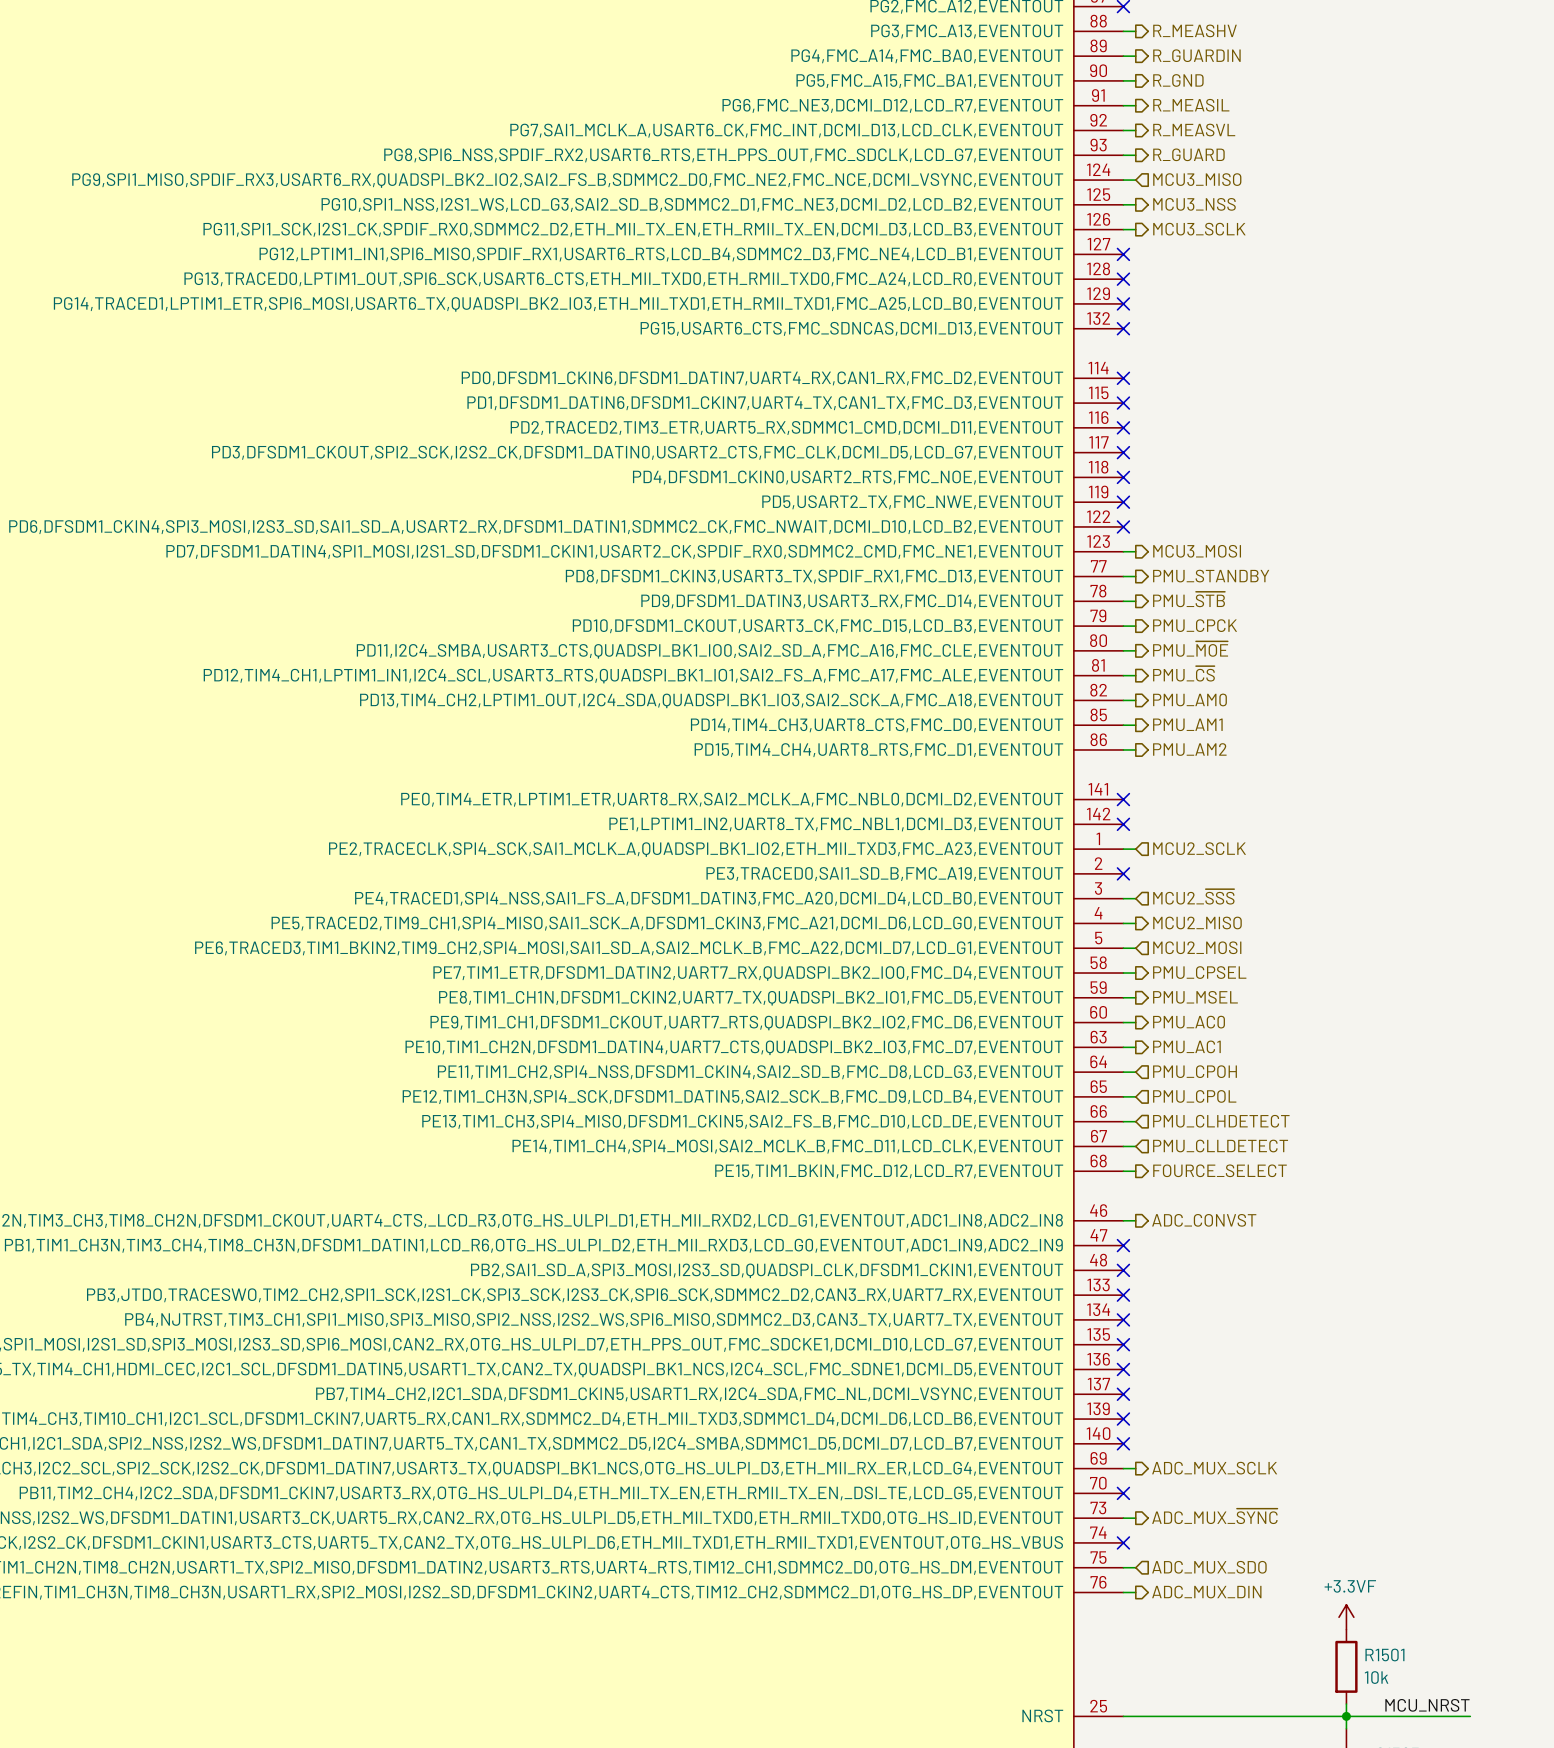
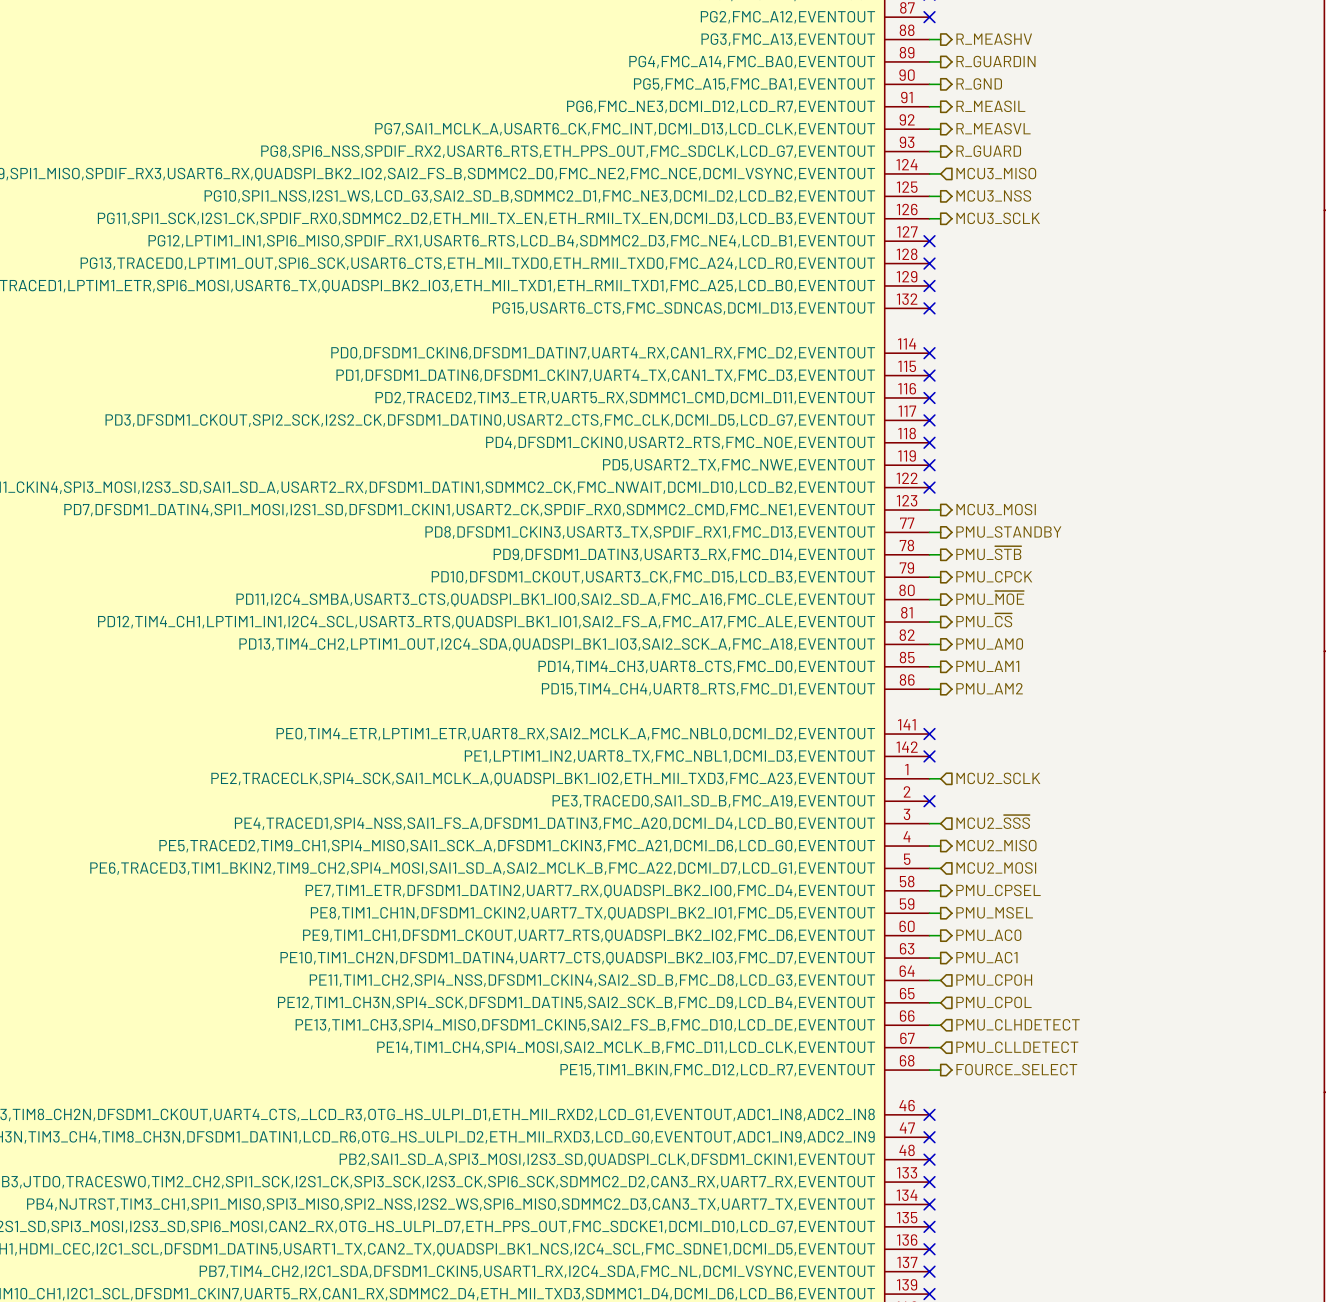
wire: (1123, 1220) (1135, 1220) -> none
no-connect mark: none -> (929, 1114)
hierarchical label: ADC_CONVST (1204, 1220) -> none

